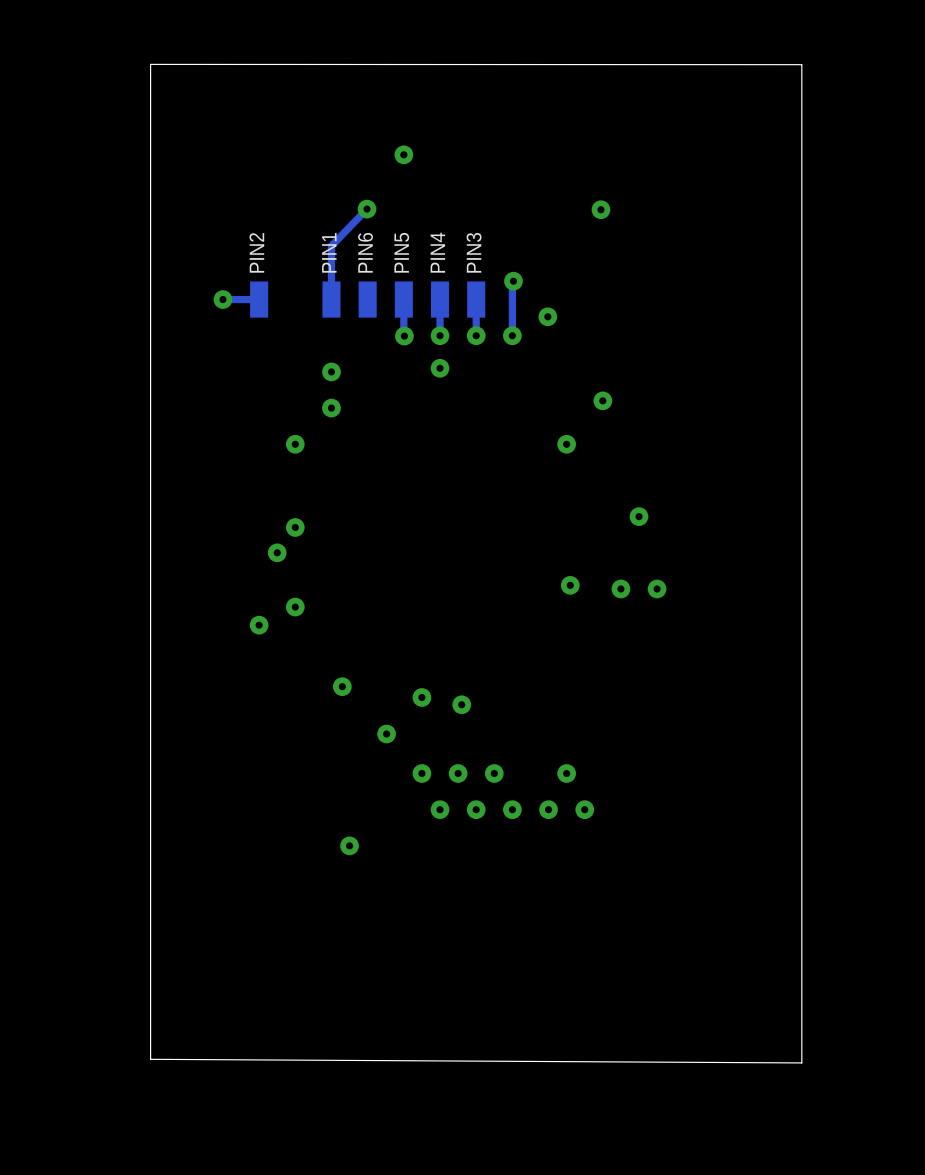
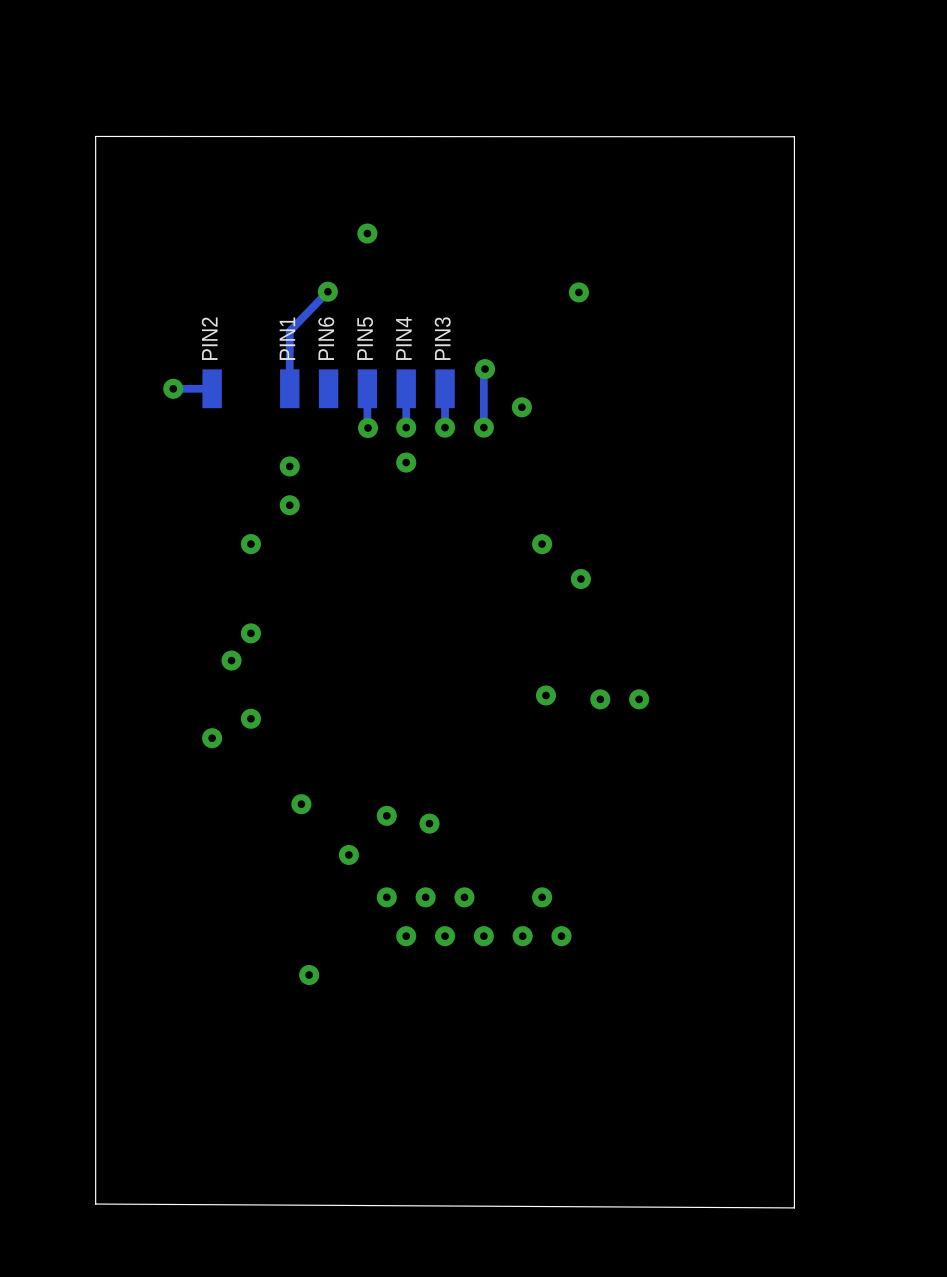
via: (602, 400) -> none
via: none -> (580, 579)
via: (639, 516) -> none

